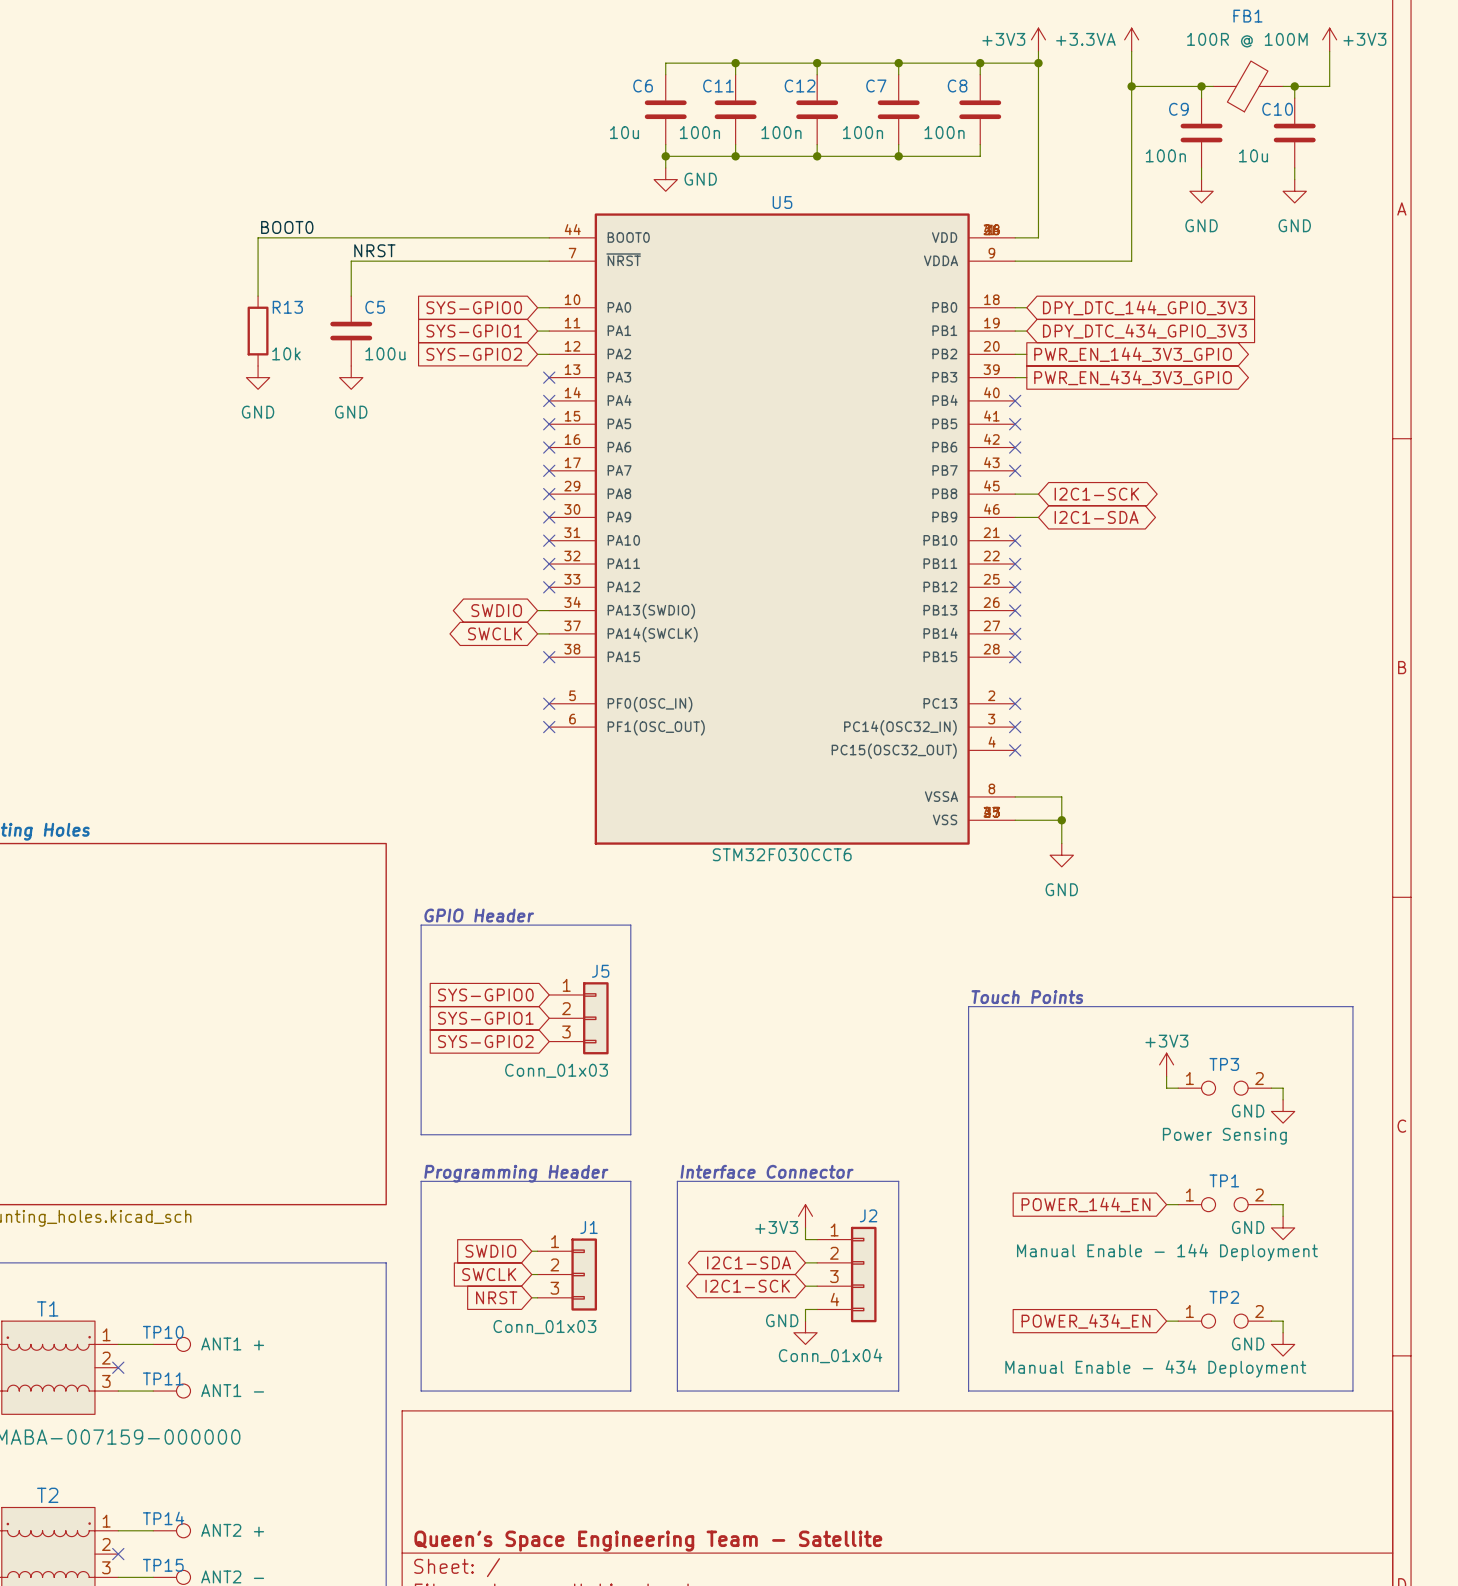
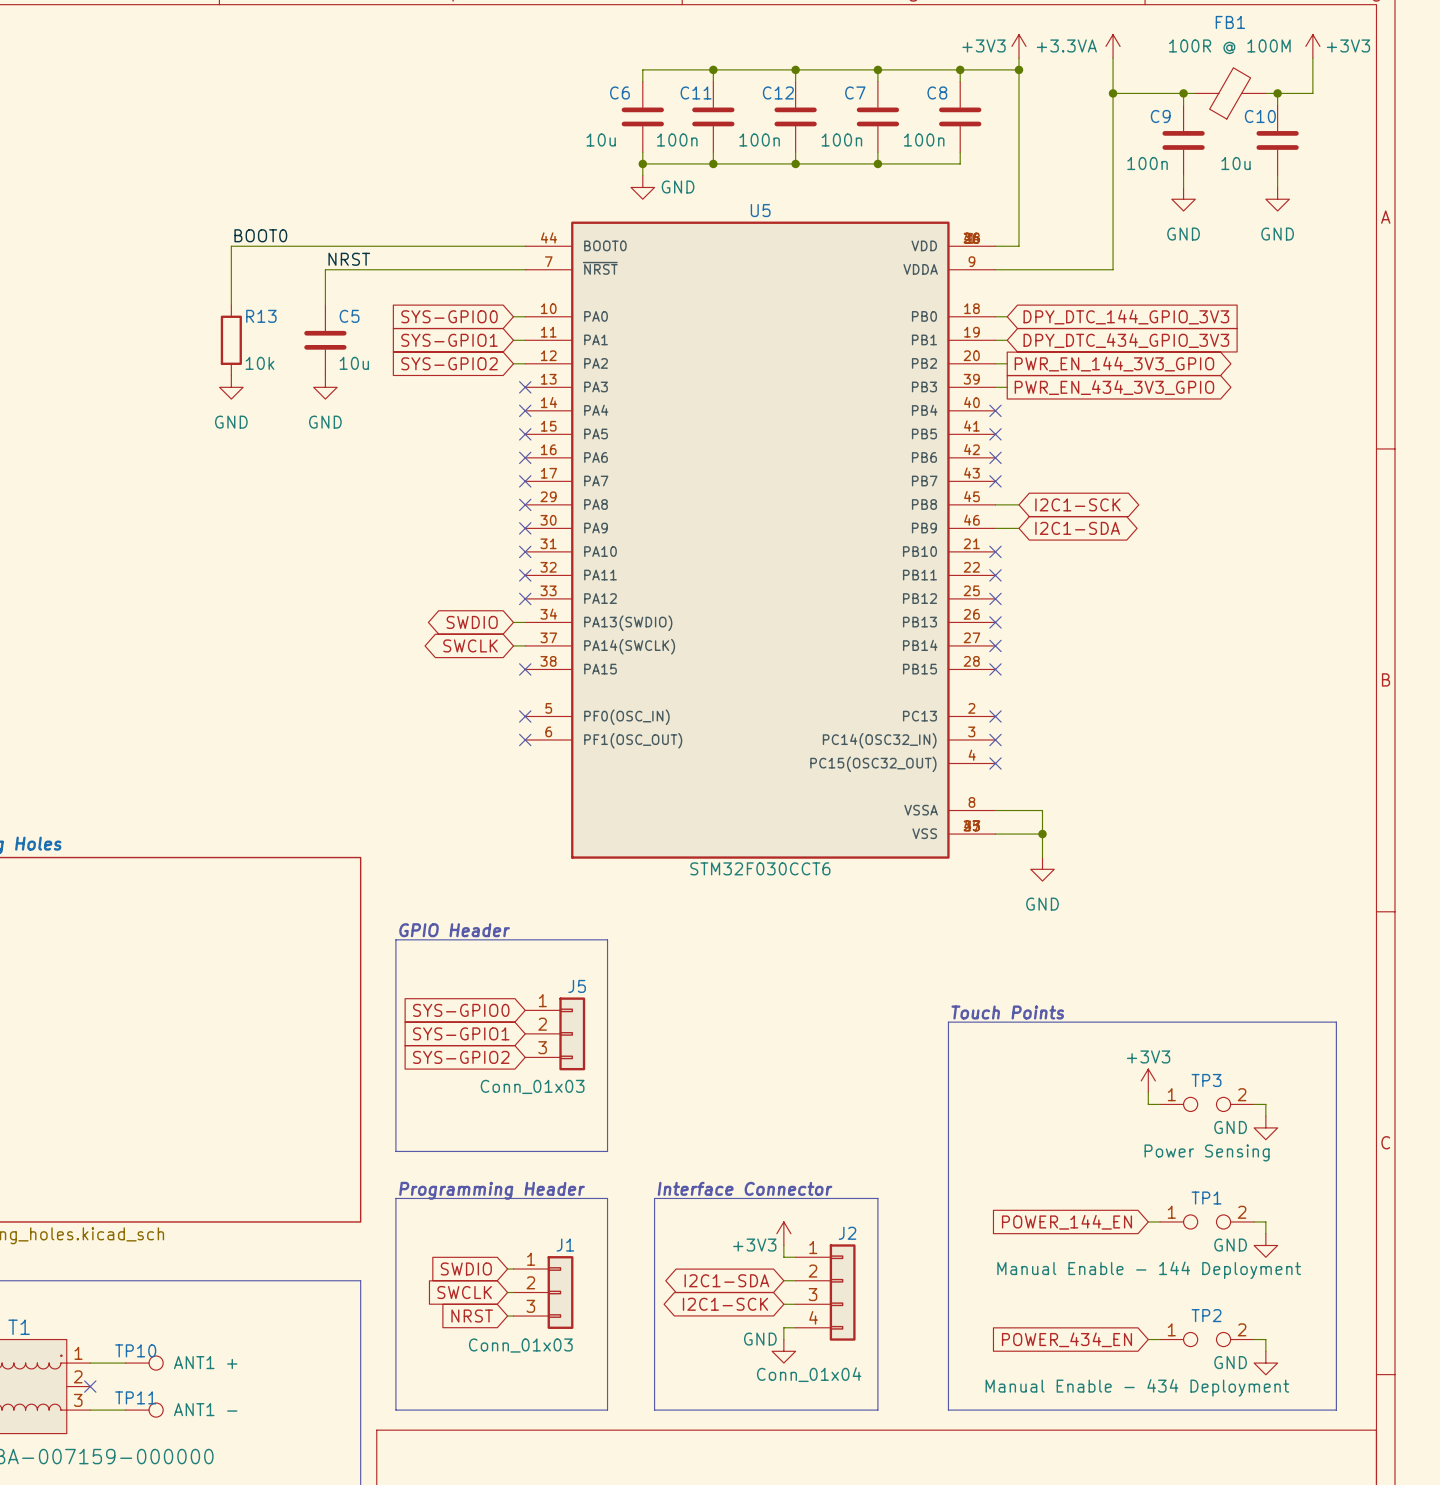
C5 value: 100u (385, 353) -> 10u (354, 363)

